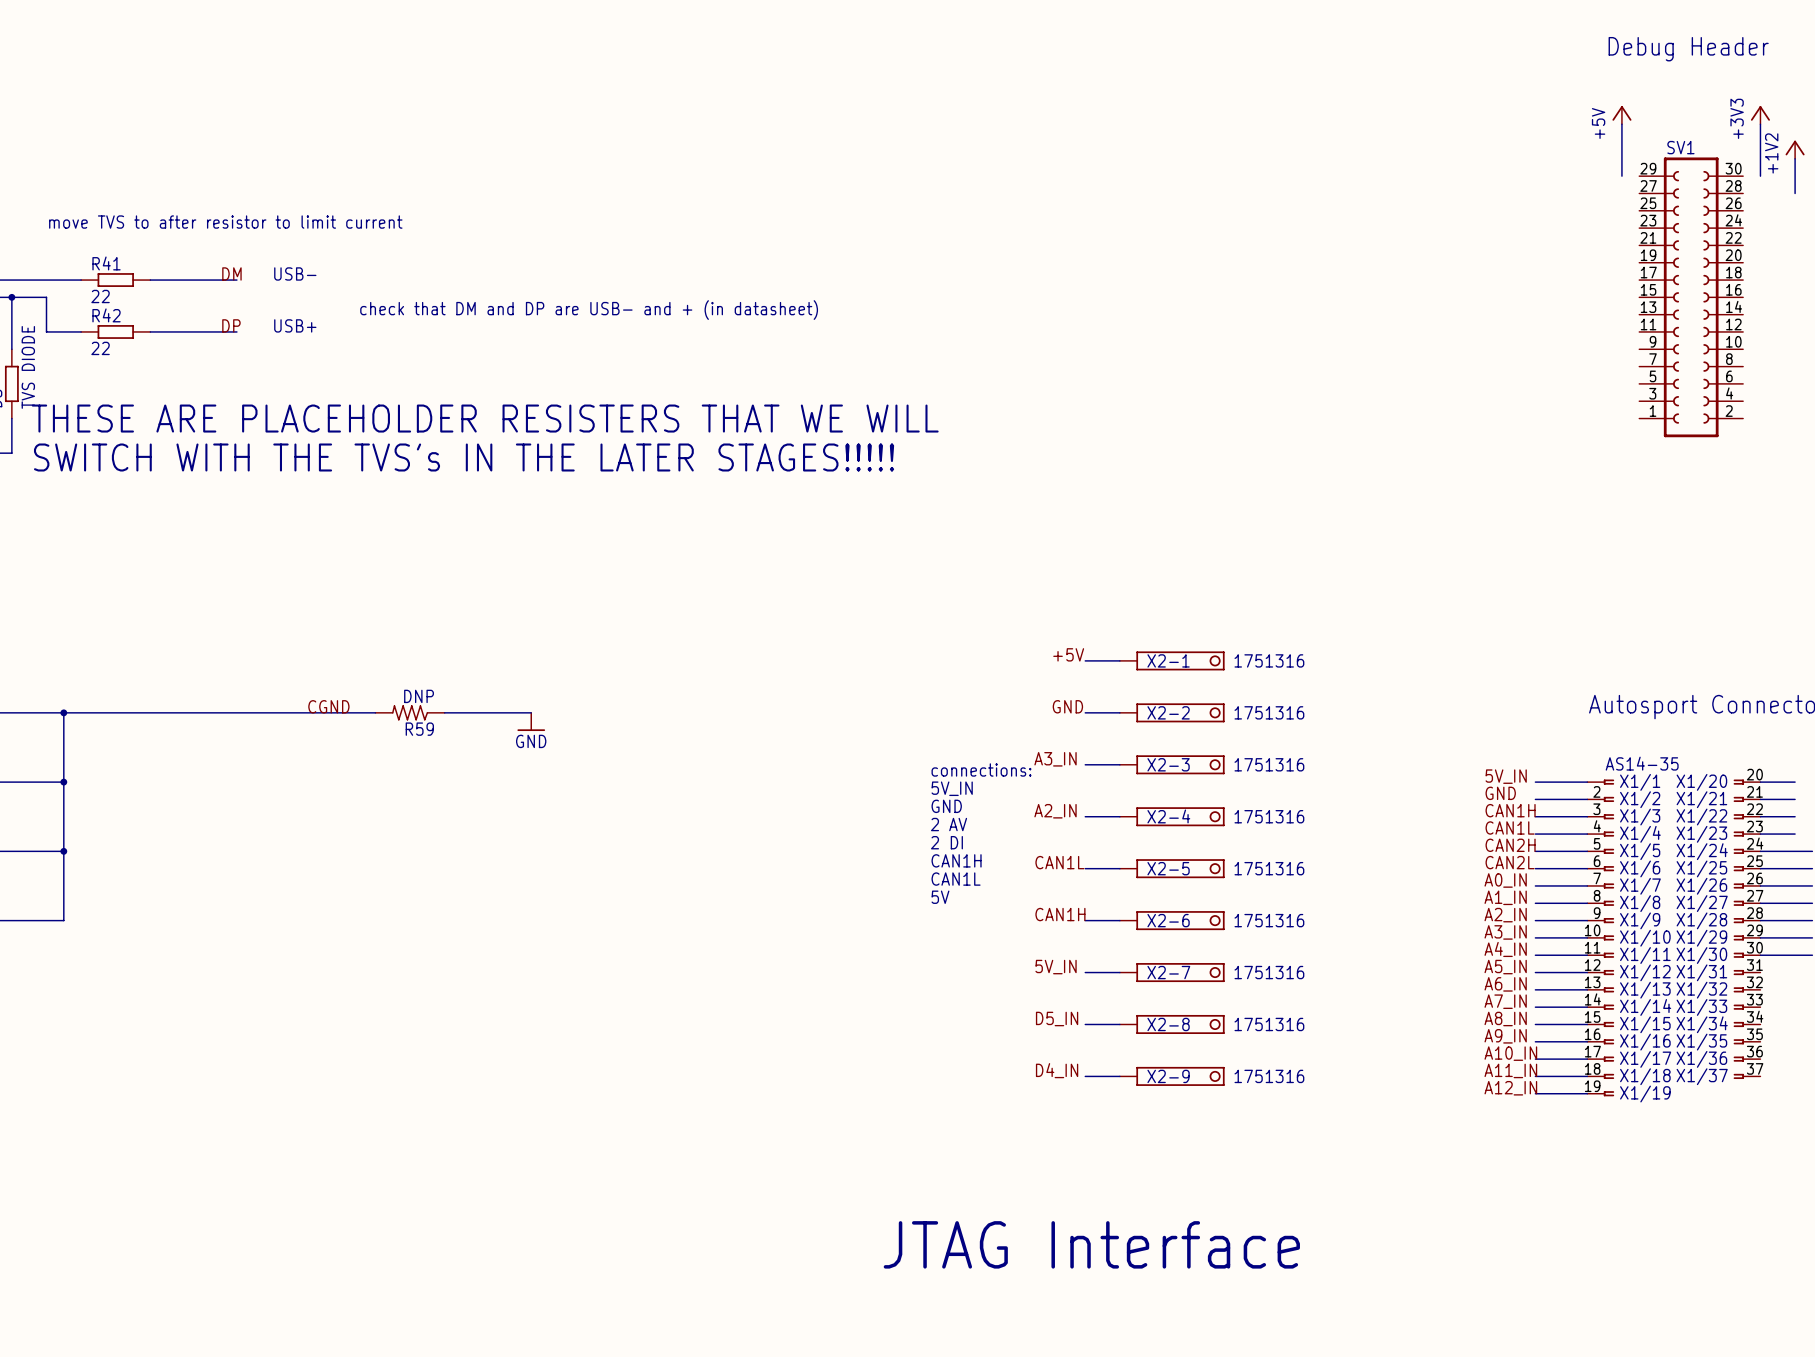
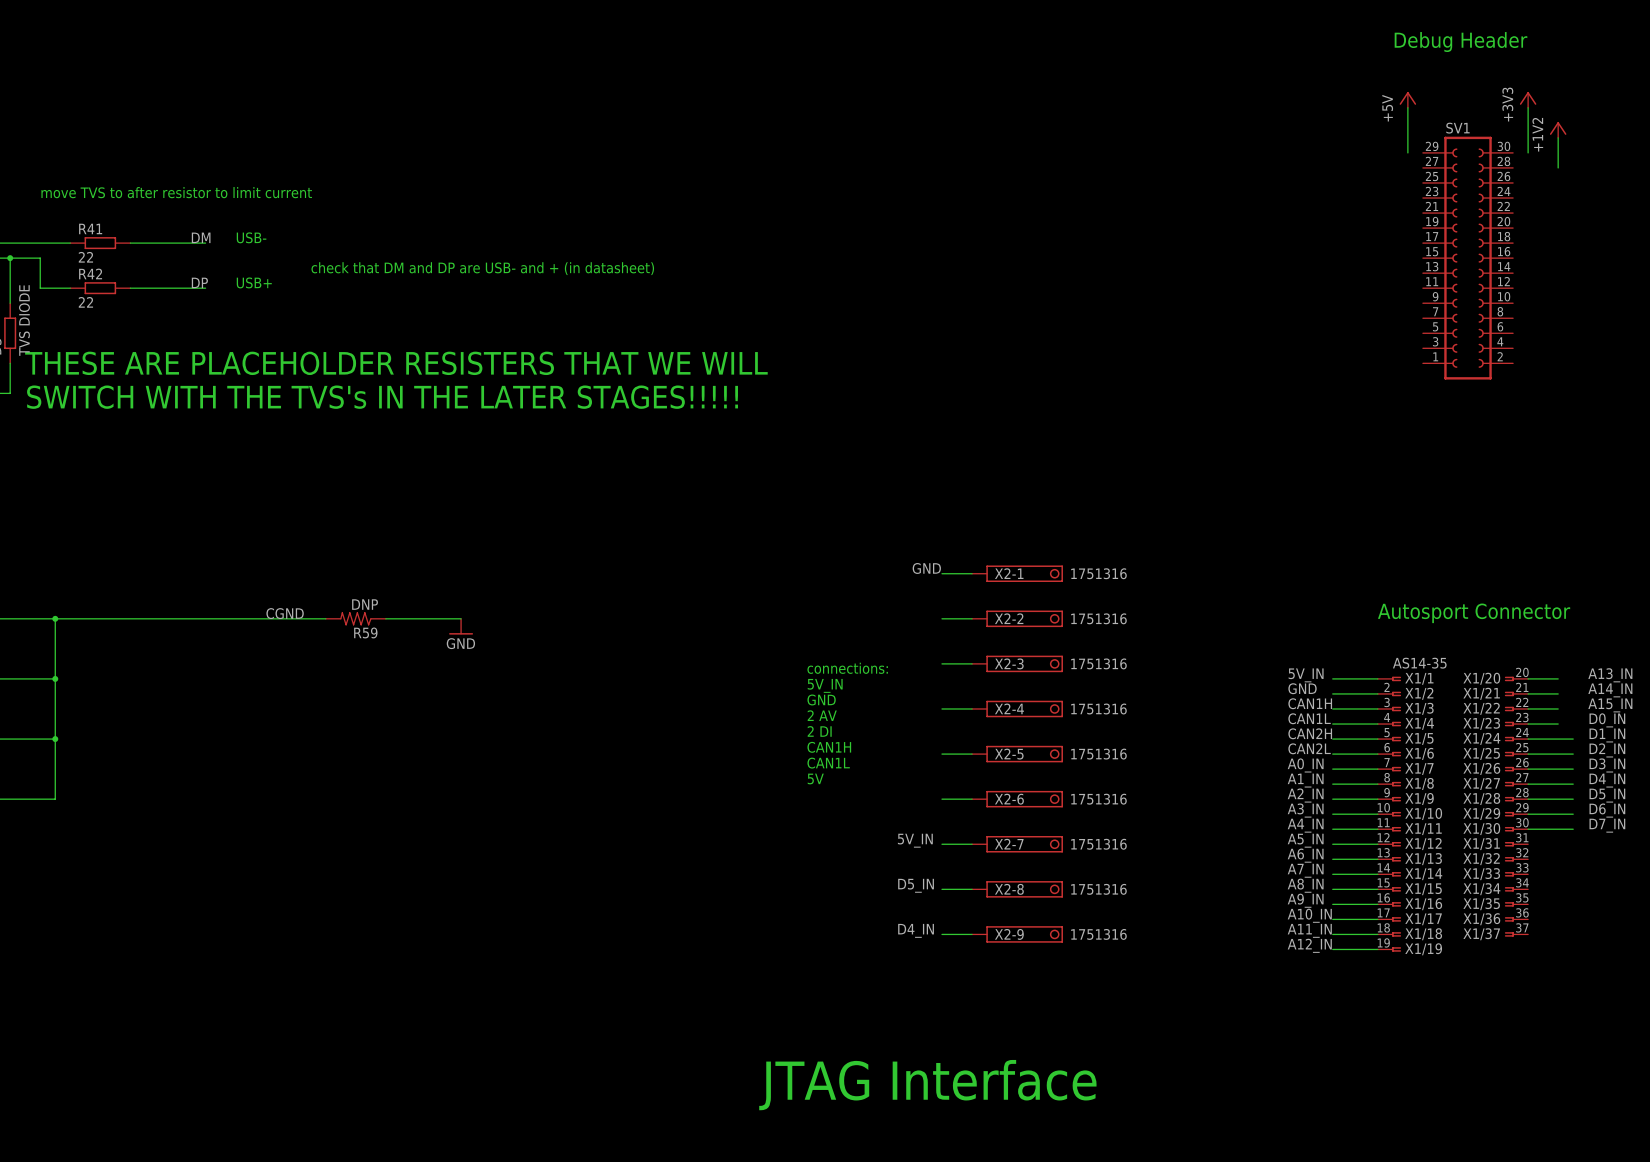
label: +5V (1068, 654) -> GND (926, 568)
label: GND (1067, 706) -> none
label: A3_IN (1055, 759) -> none
label: A2_IN (1055, 811) -> none
label: CAN1L (1059, 862) -> none
label: CAN1H (1060, 914) -> none

